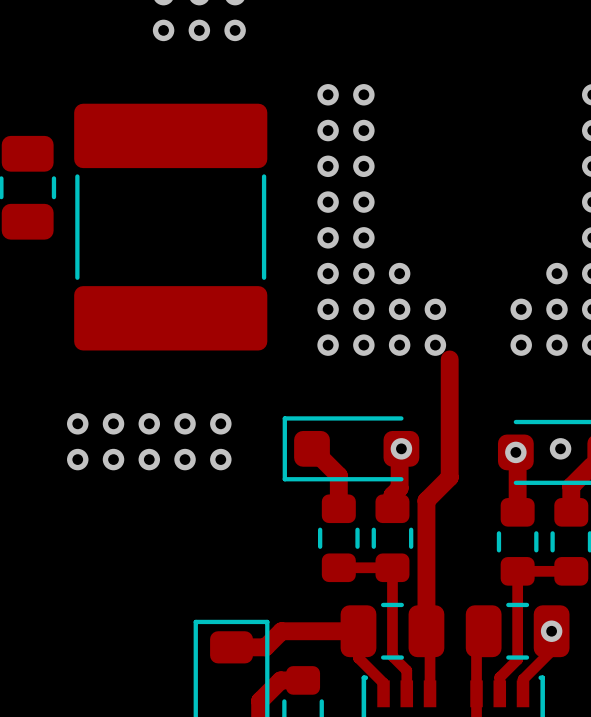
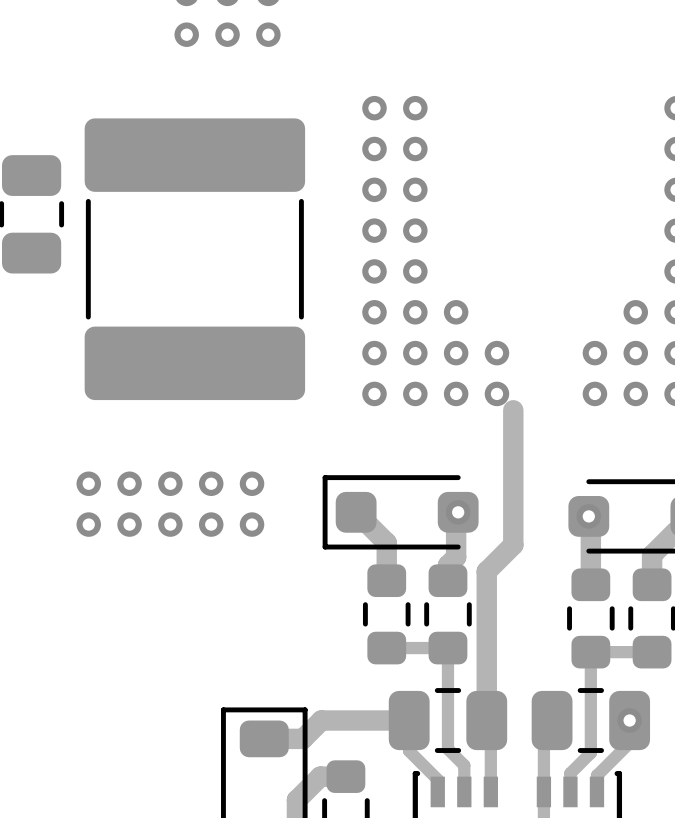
via: (560, 448) -> none

